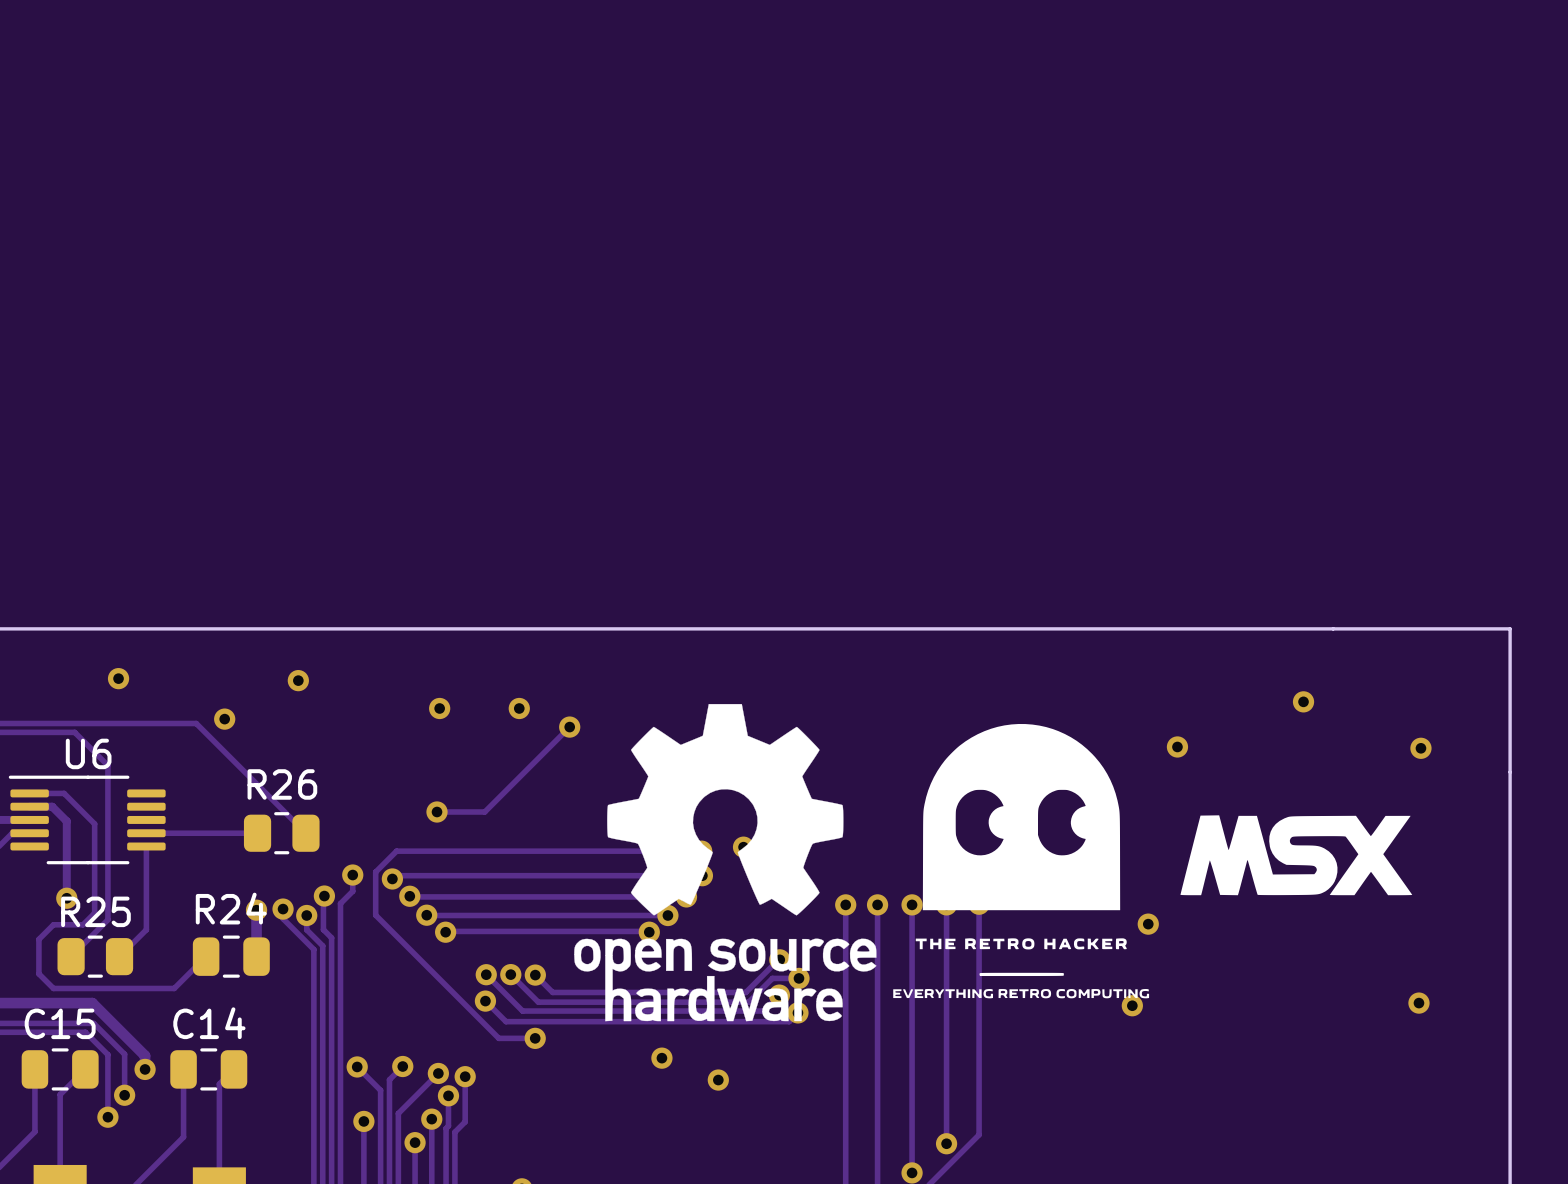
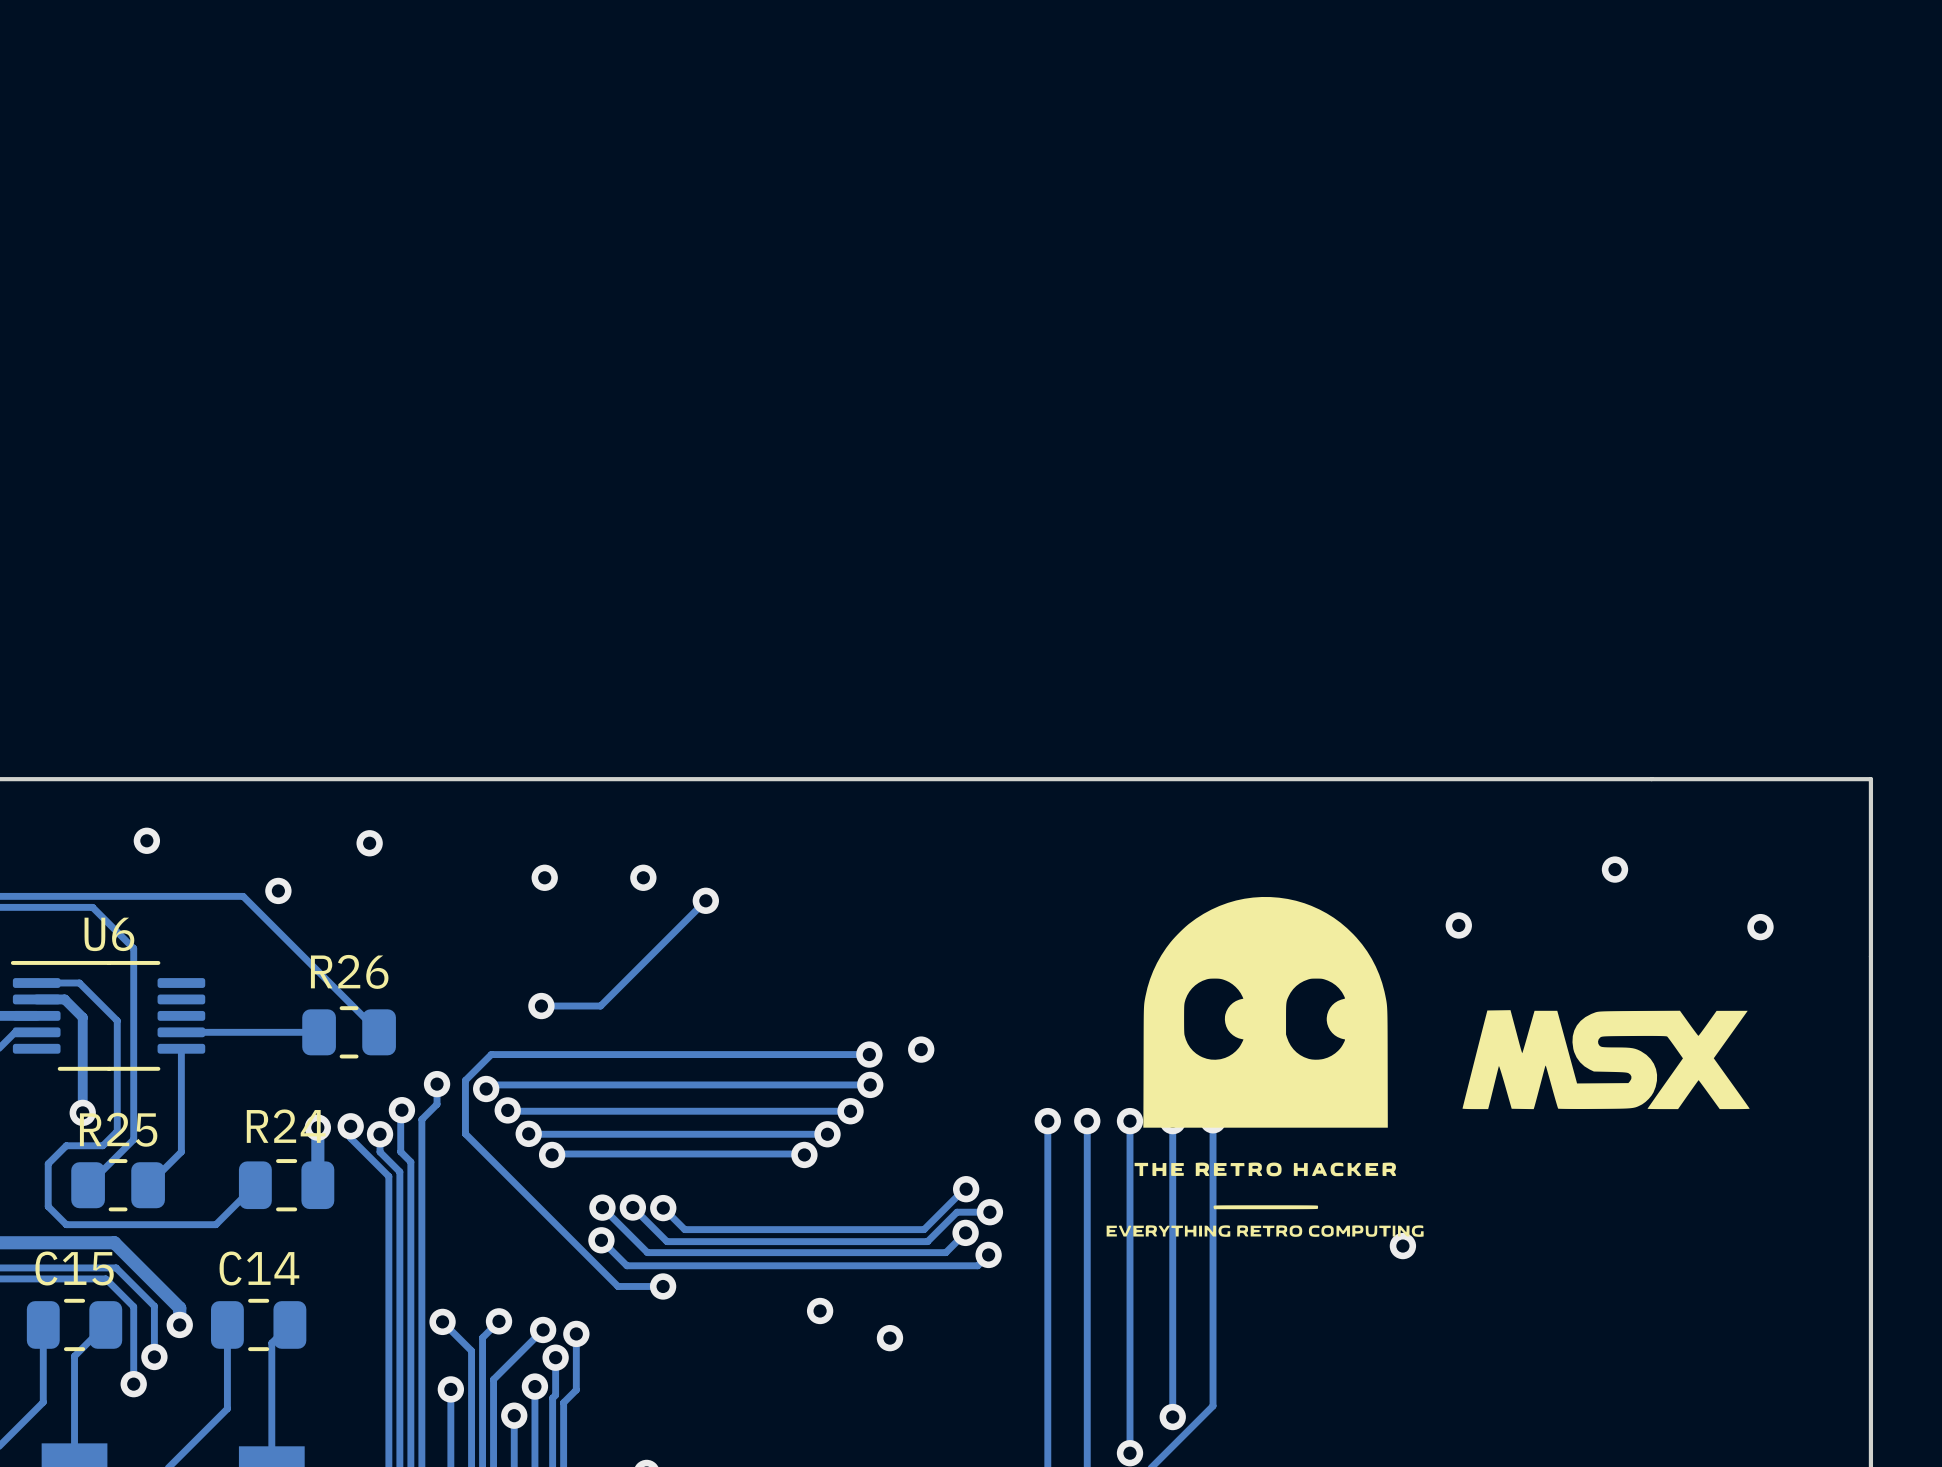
drawing: [574, 704, 877, 1022] -> none
via: (1148, 924) -> none
via: (1418, 1003) -> none

